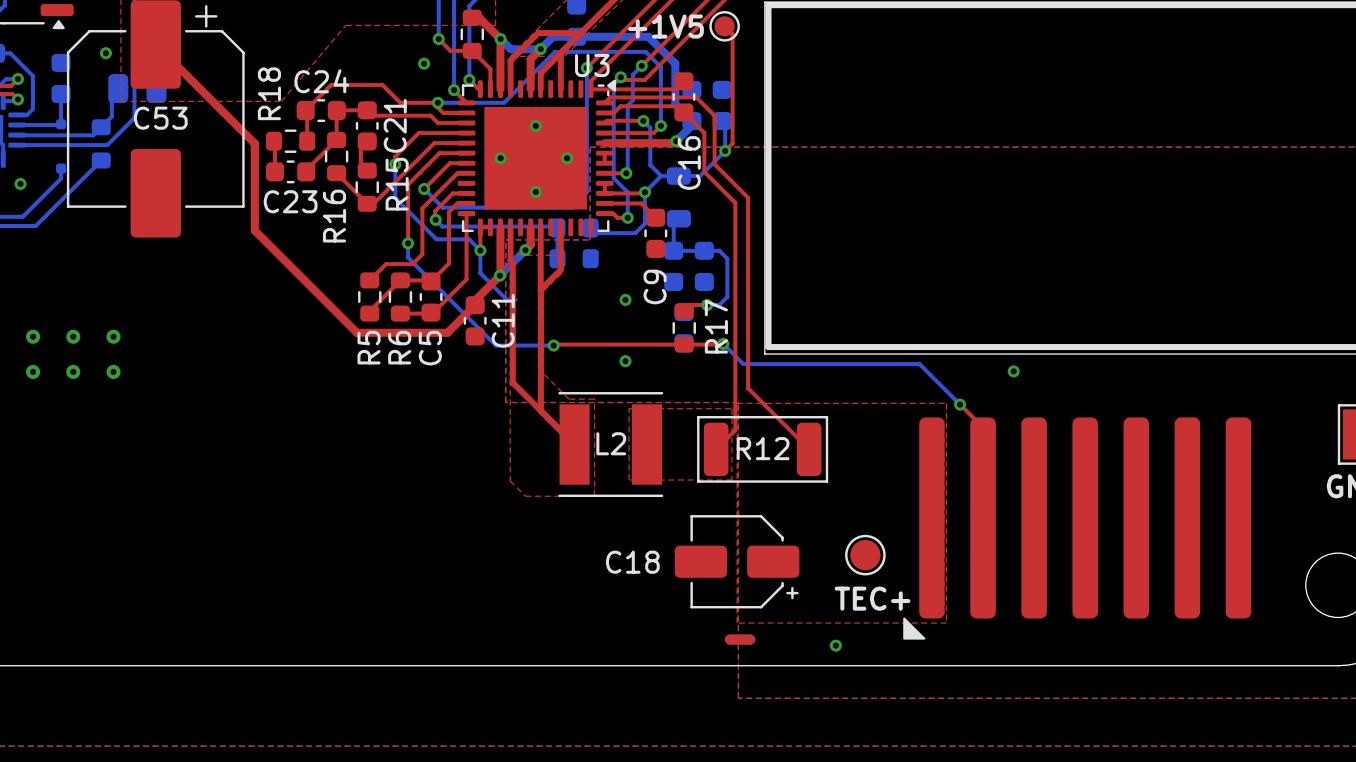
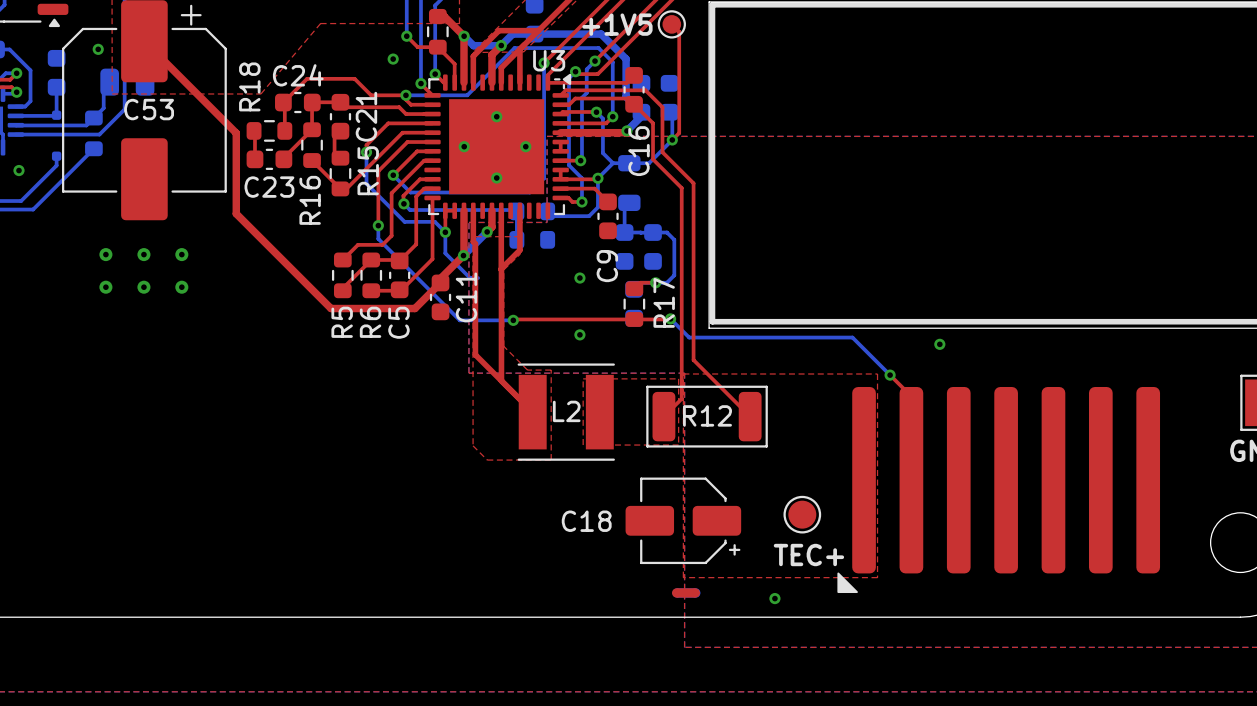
via: none -> (105, 254)
via: none -> (143, 254)
via: none -> (181, 254)
via: none -> (105, 287)
via: none -> (143, 287)
via: none -> (181, 287)
via: (33, 336) -> none
via: (73, 336) -> none
via: (113, 336) -> none
via: (33, 371) -> none
via: (73, 371) -> none
via: (113, 371) -> none

